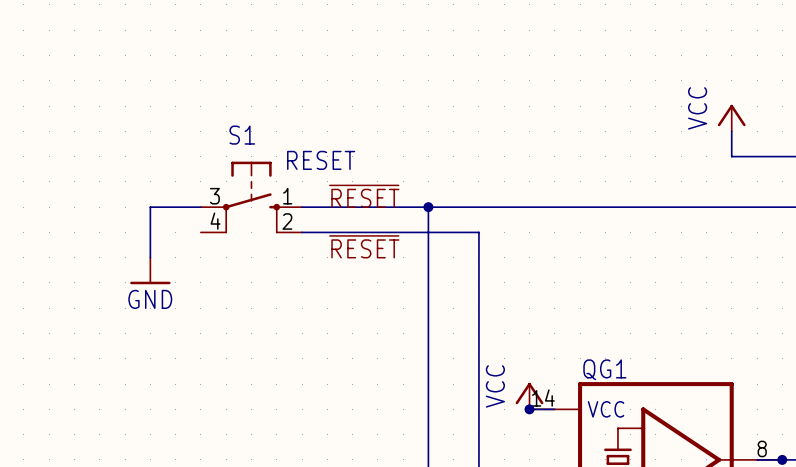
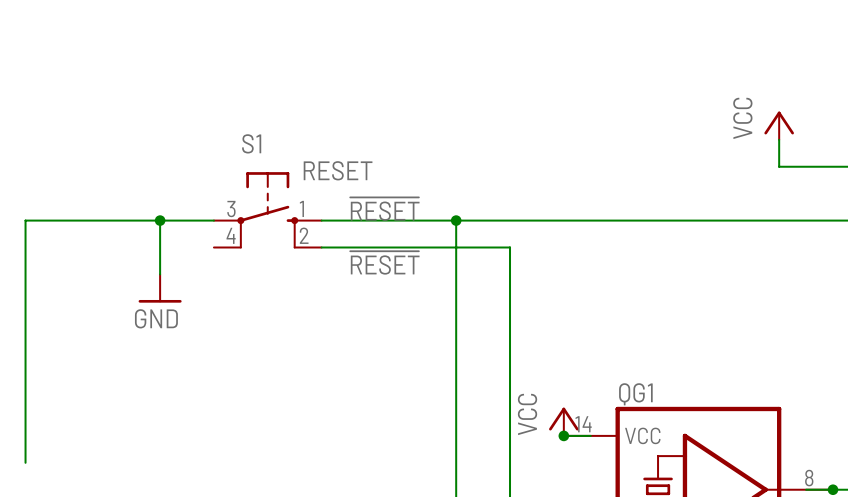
wire: none -> (160, 220) (25, 220) (25, 462)
junction: none -> (160, 220)

